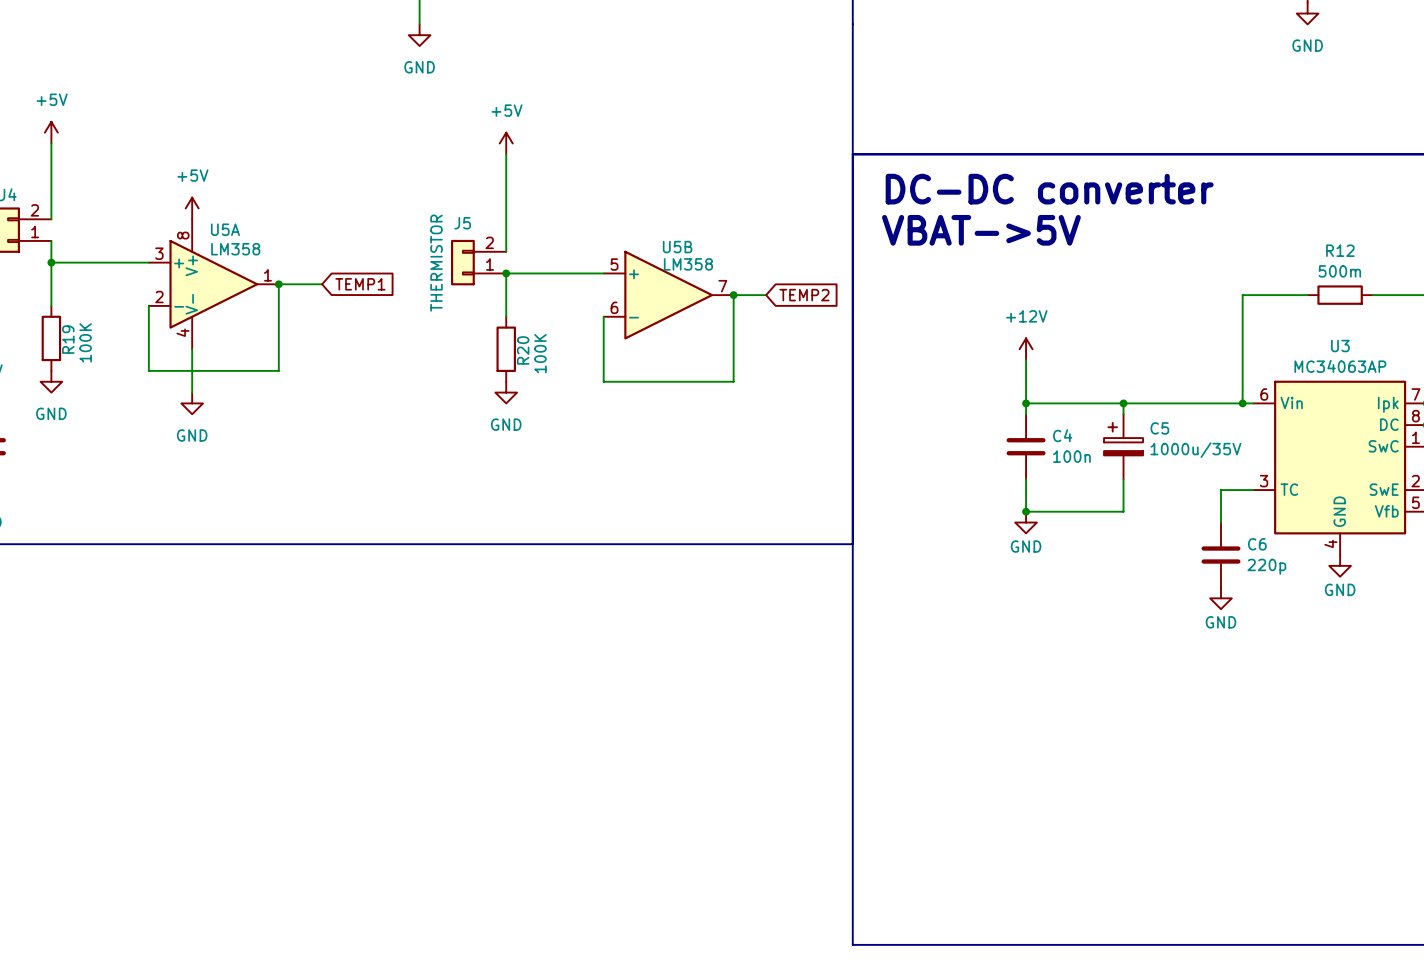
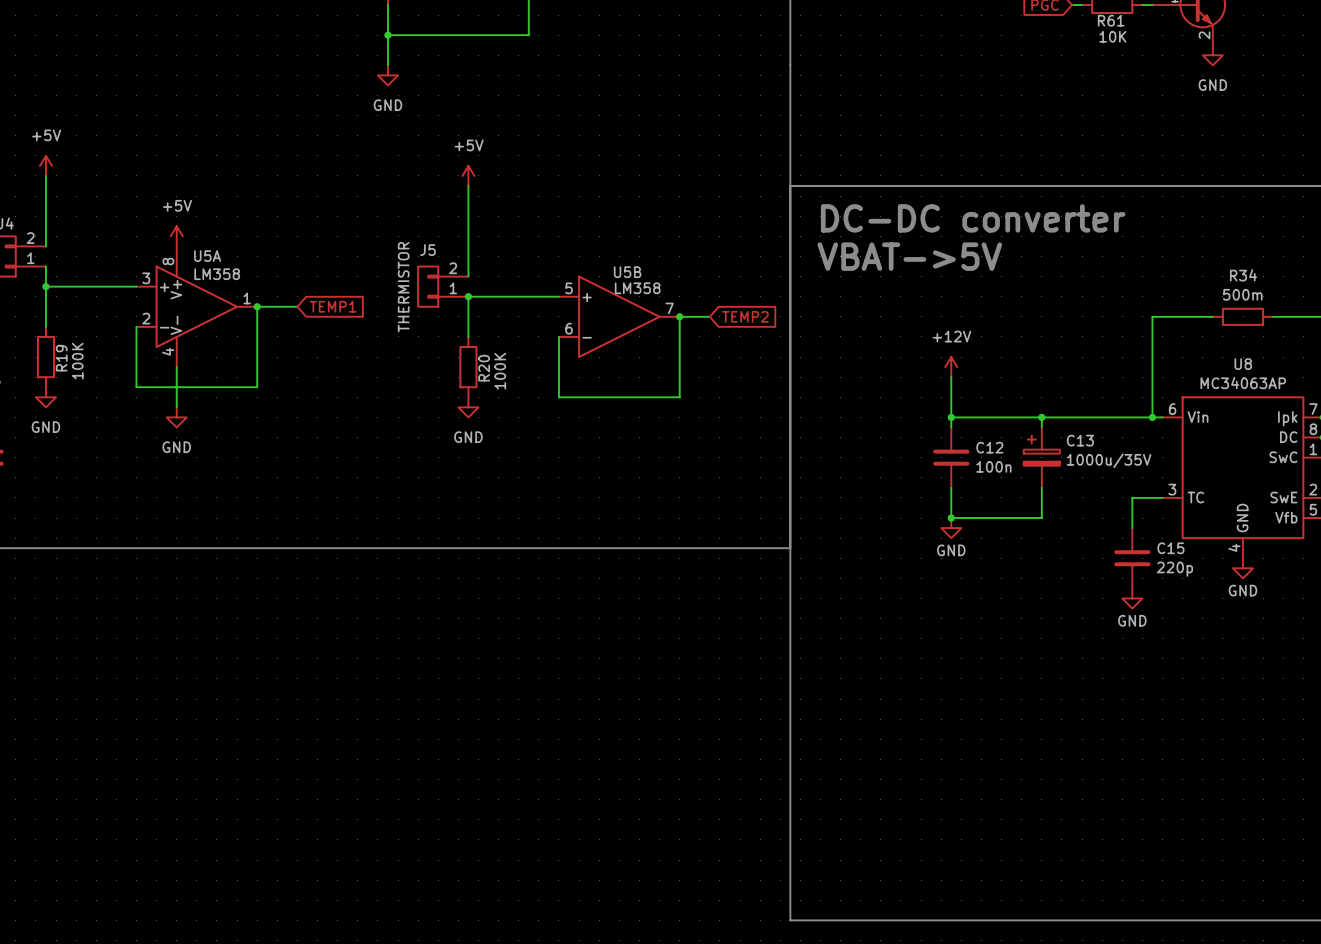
R12 name: R12 (1340, 250) -> R34 (1243, 275)
U3 name: U3 (1340, 346) -> U8 (1243, 364)
C5 name: C5 (1159, 428) -> C13 (1080, 440)
C4 name: C4 (1062, 435) -> C12 (989, 447)
C6 name: C6 (1257, 544) -> C15 (1170, 548)

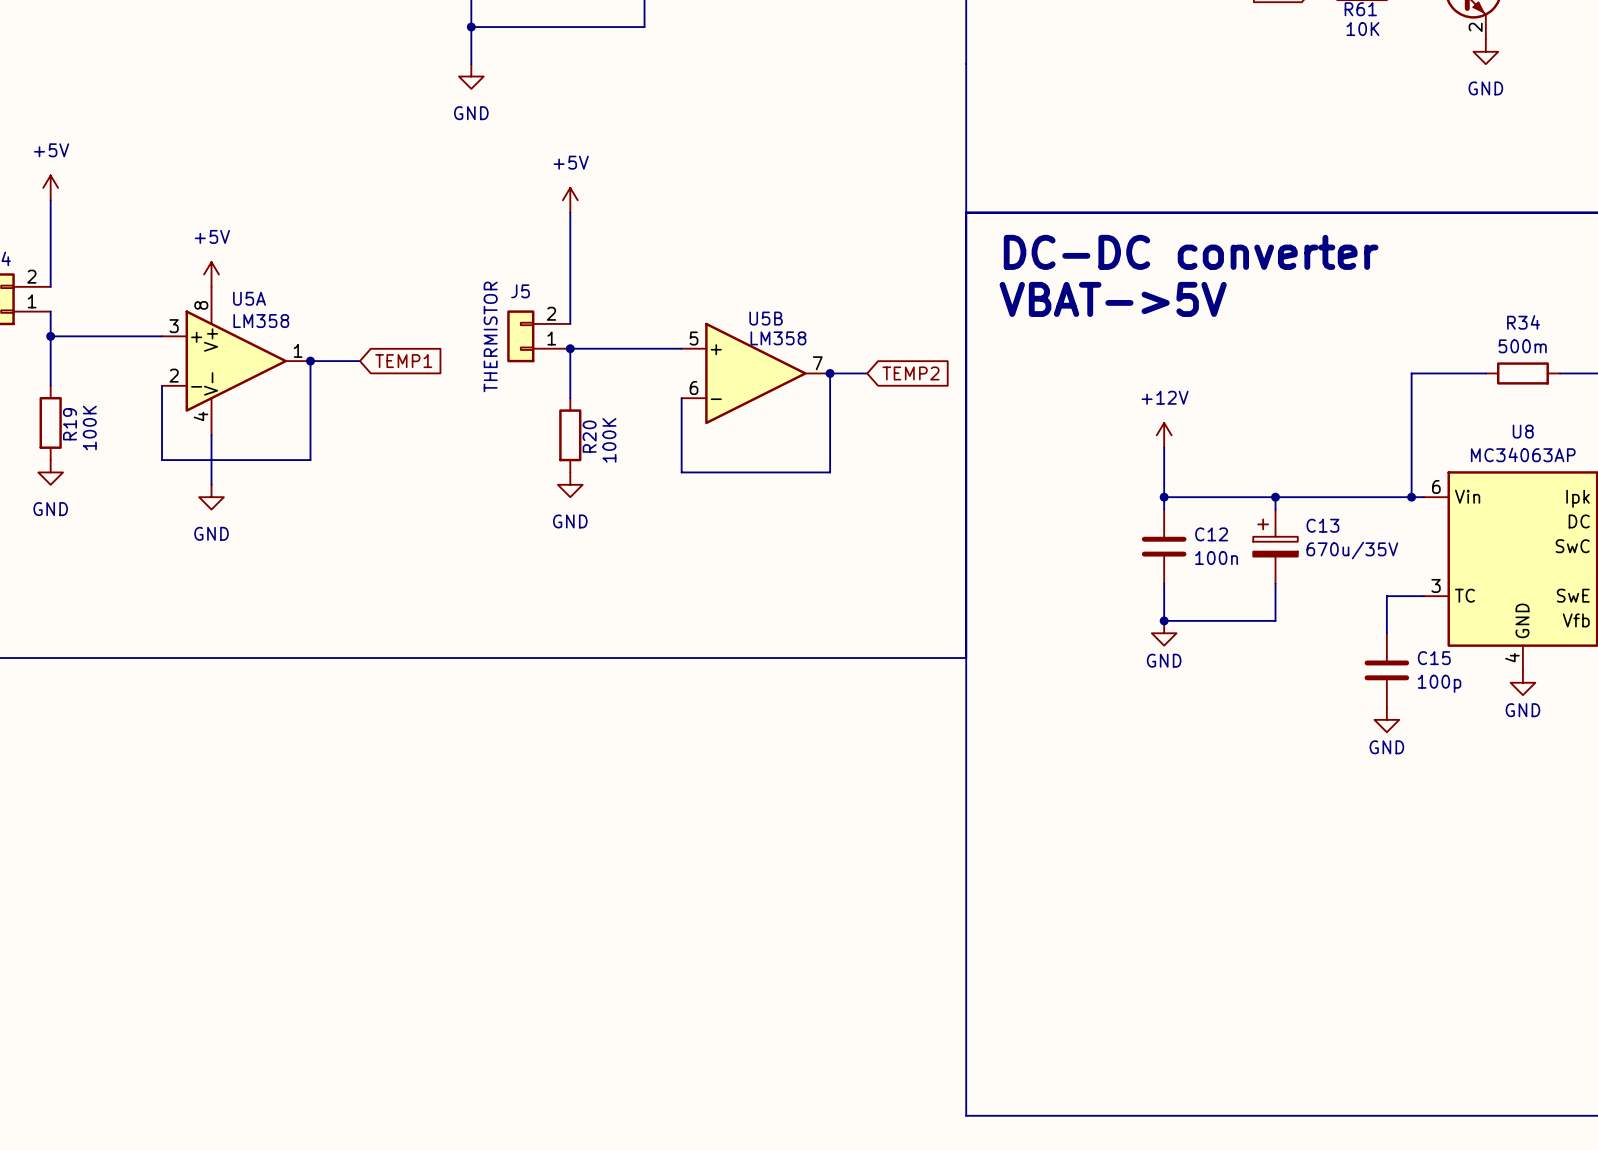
C13 value: 1000u/35V (1109, 460) -> 670u/35V (1352, 550)
C15 value: 220p (1174, 569) -> 100p (1439, 683)

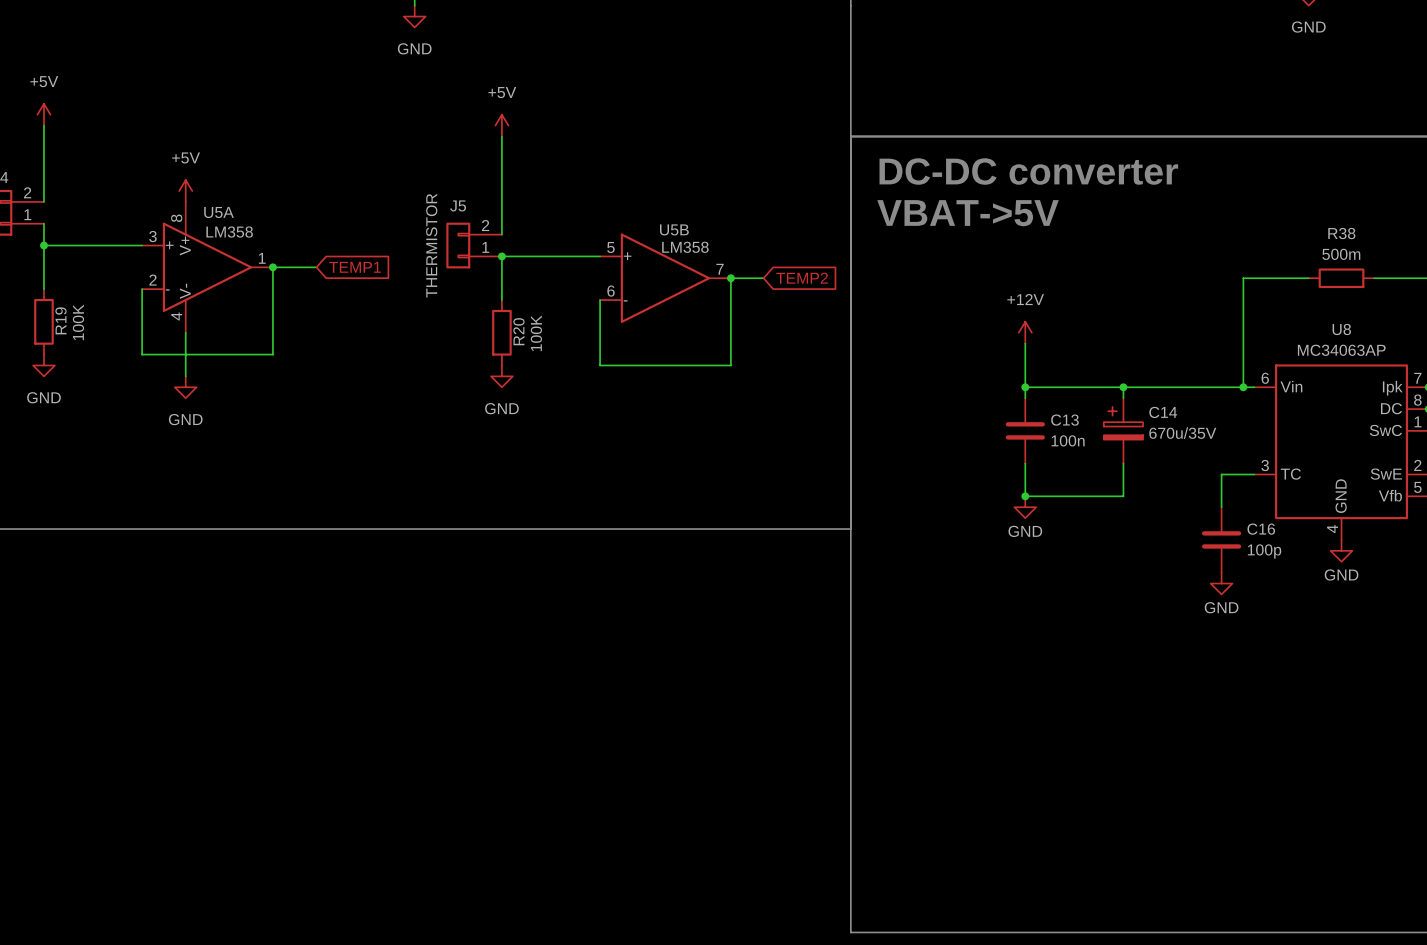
R34 name: R34 (1523, 322) -> R38 (1341, 233)
C13 name: C13 (1322, 525) -> C14 (1163, 412)
C12 name: C12 (1211, 534) -> C13 (1064, 420)
C15 name: C15 (1434, 658) -> C16 (1261, 529)

